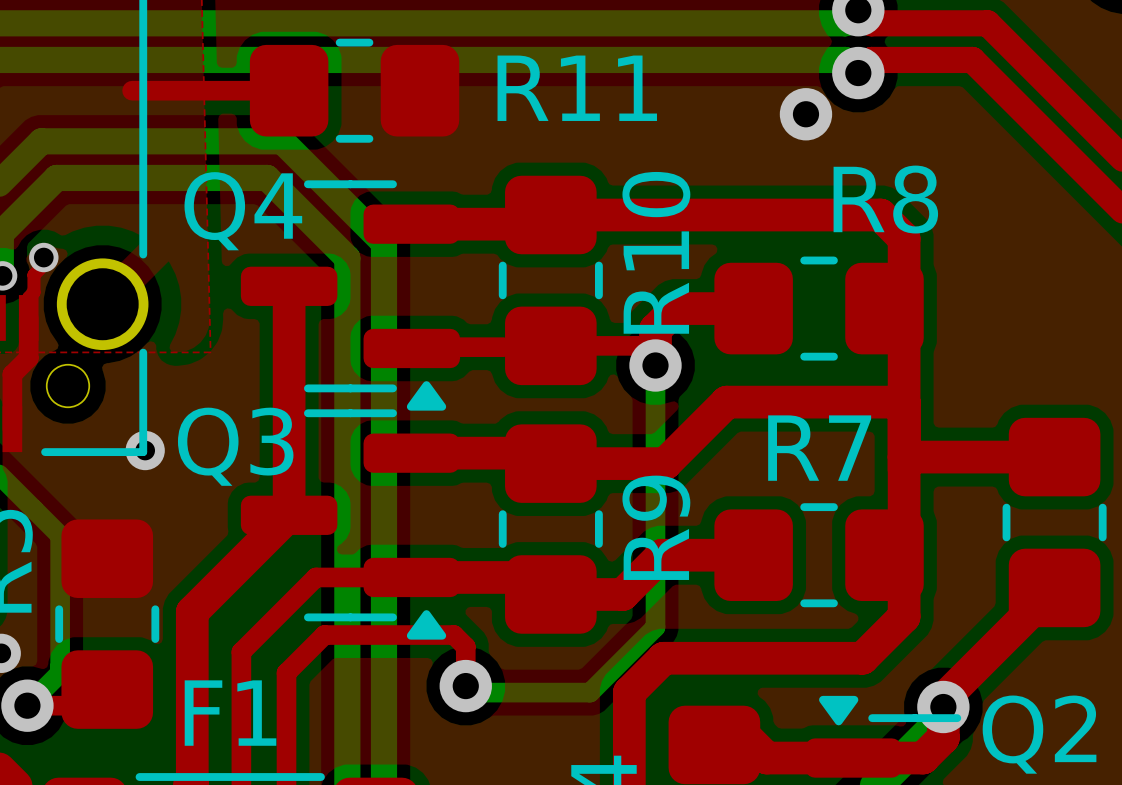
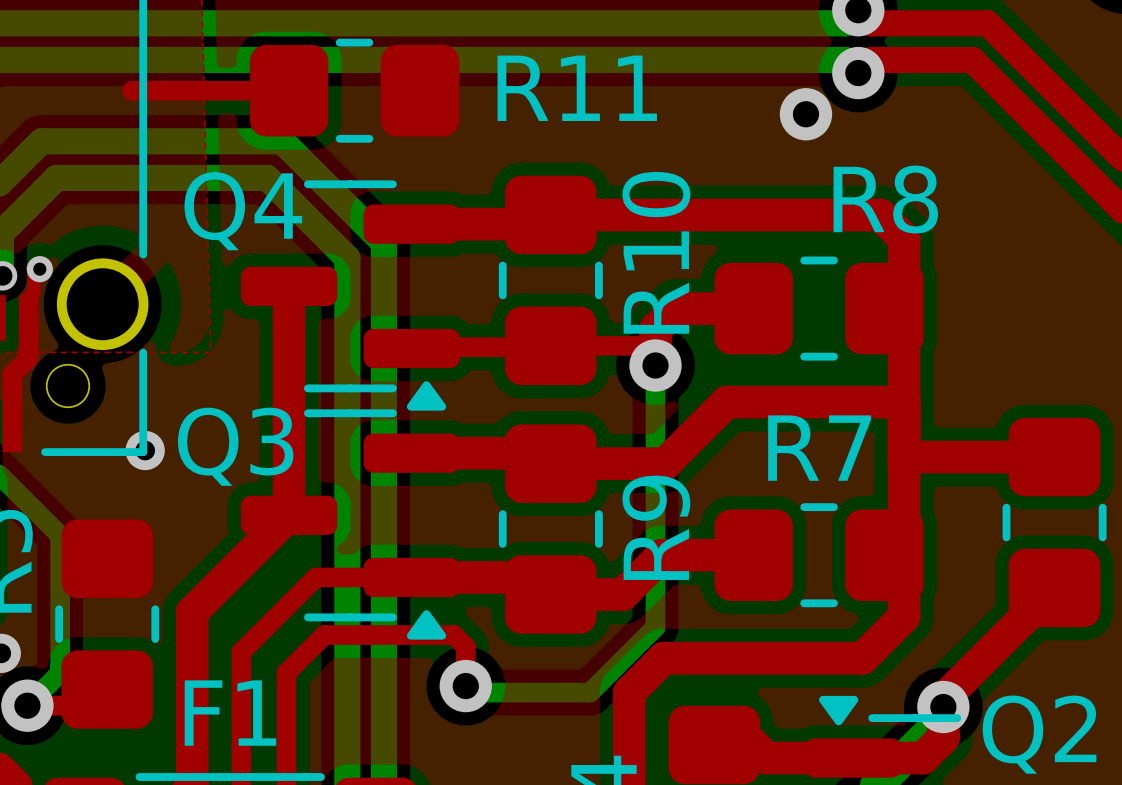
via position: (43, 257) -> (39, 269)

